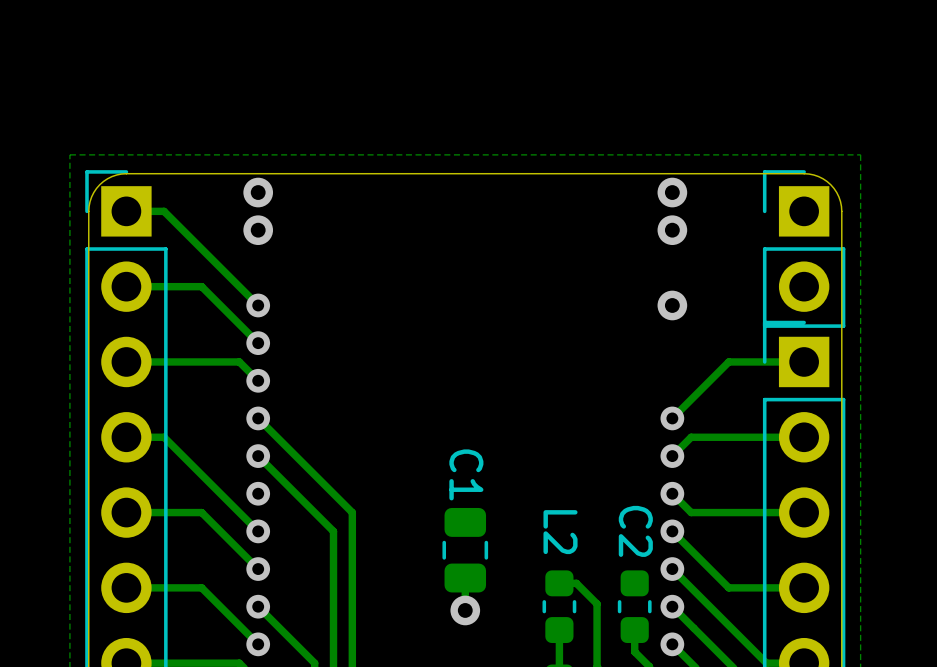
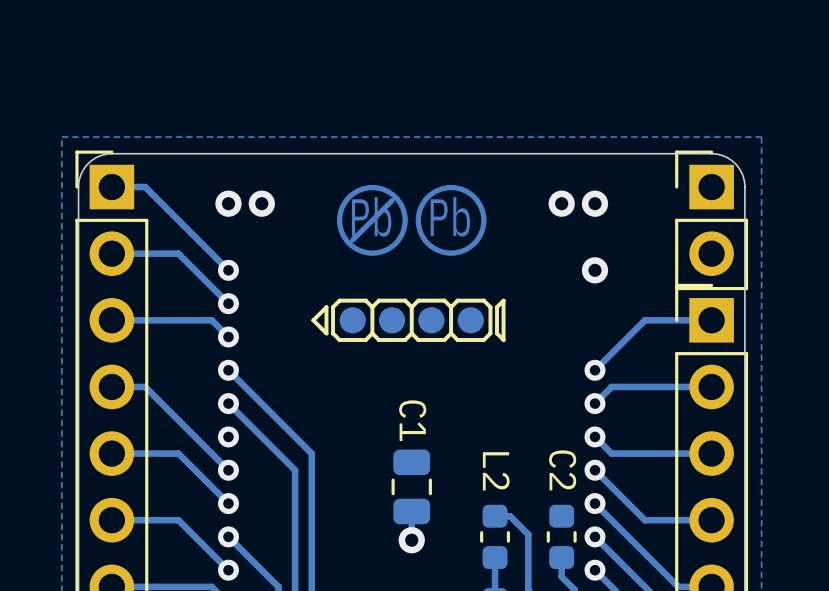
via position: (258, 192) -> (261, 203)
via position: (672, 192) -> (561, 203)
drawing: none -> [336, 184, 487, 256]
drawing: none -> [311, 298, 506, 342]

